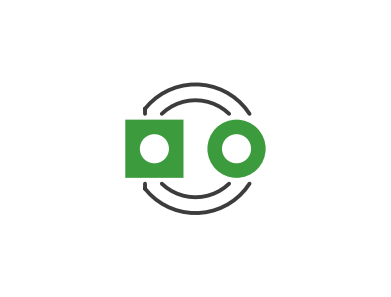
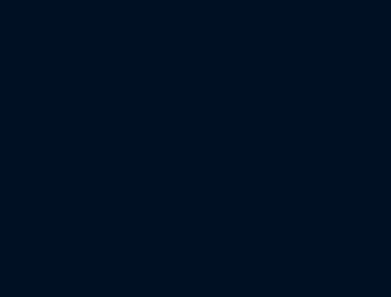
part: (195, 148) -> none

